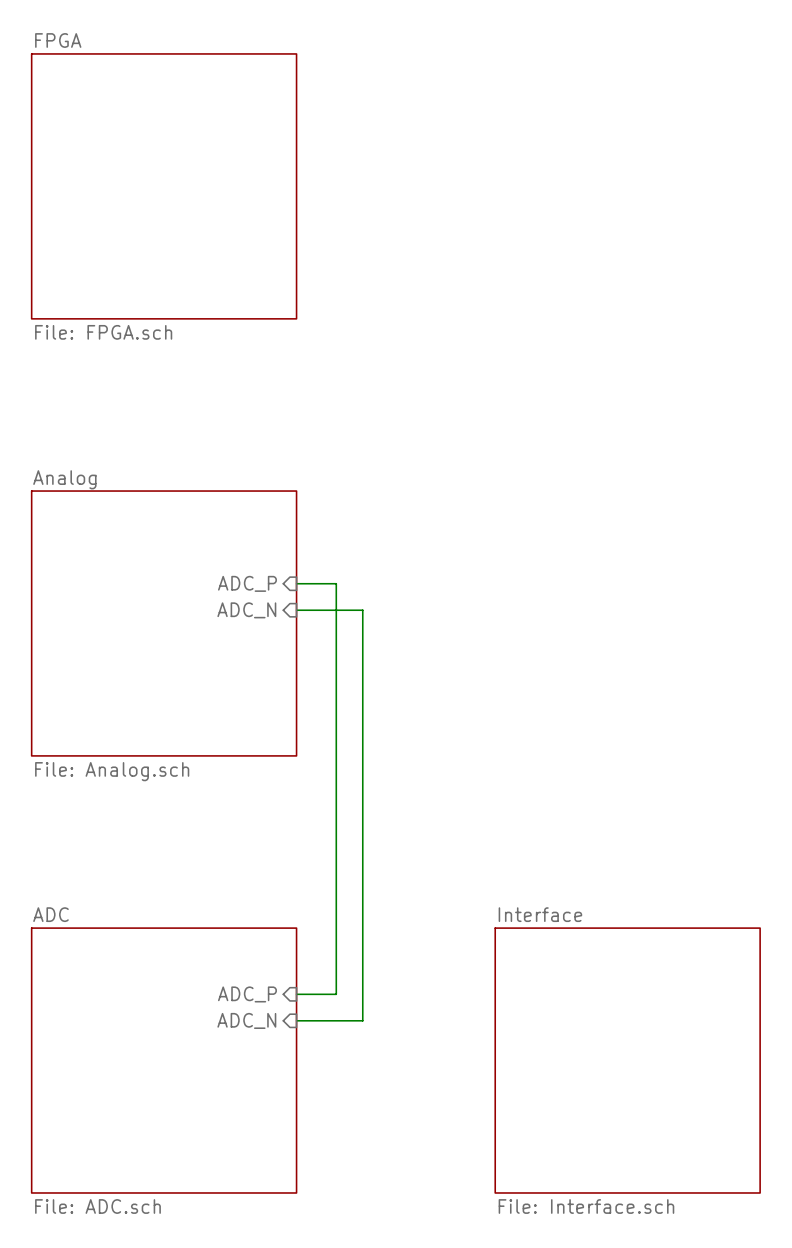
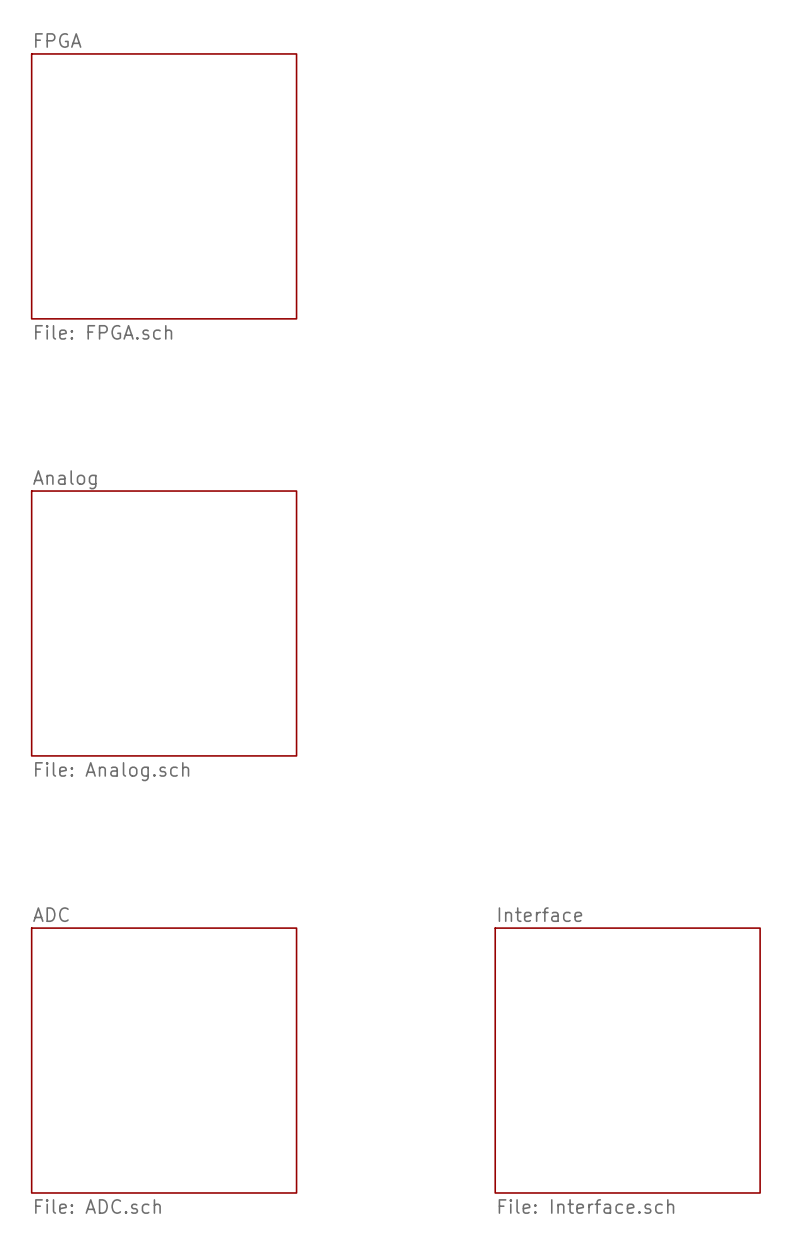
sheet pin: ADC_P (247, 583) -> none
wire: (296, 583) (336, 583) (336, 994) (296, 994) -> none
sheet pin: ADC_N (246, 610) -> none
wire: (296, 610) (362, 610) (362, 1020) (296, 1020) -> none
sheet pin: ADC_P (247, 994) -> none
sheet pin: ADC_N (246, 1020) -> none

